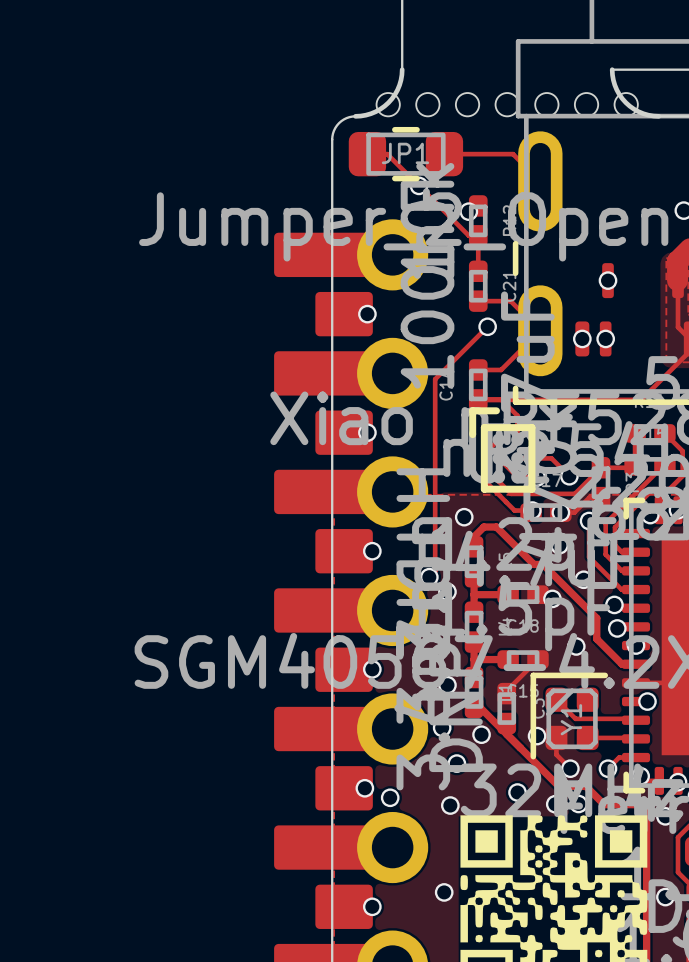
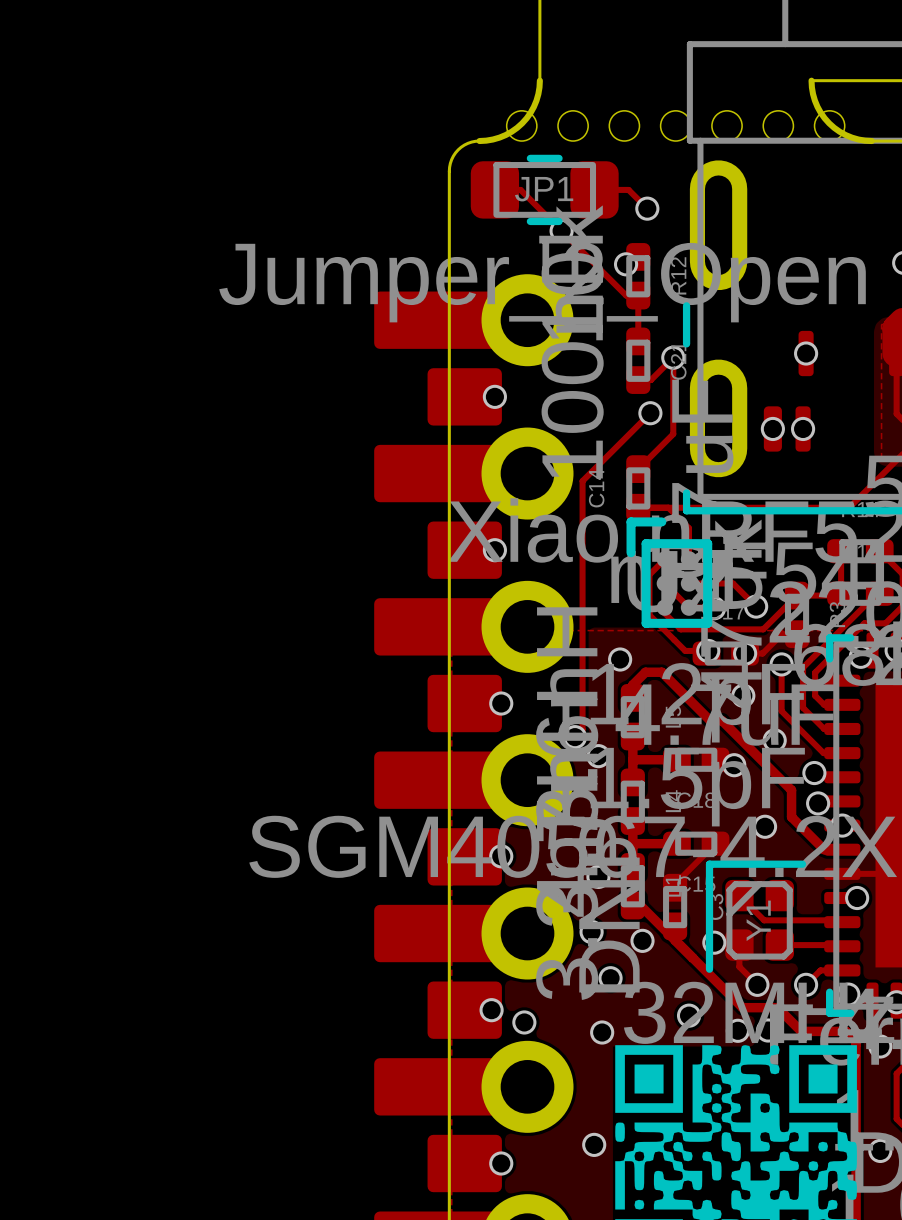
track: (470, 154) (513, 154) (540, 181) -> (628, 189) (647, 208)
via: none -> (647, 208)
via: none -> (673, 357)
track: (488, 301) (510, 301) (540, 330) (501, 369) (478, 369) -> (650, 380) (673, 357) (673, 434) (638, 469)

